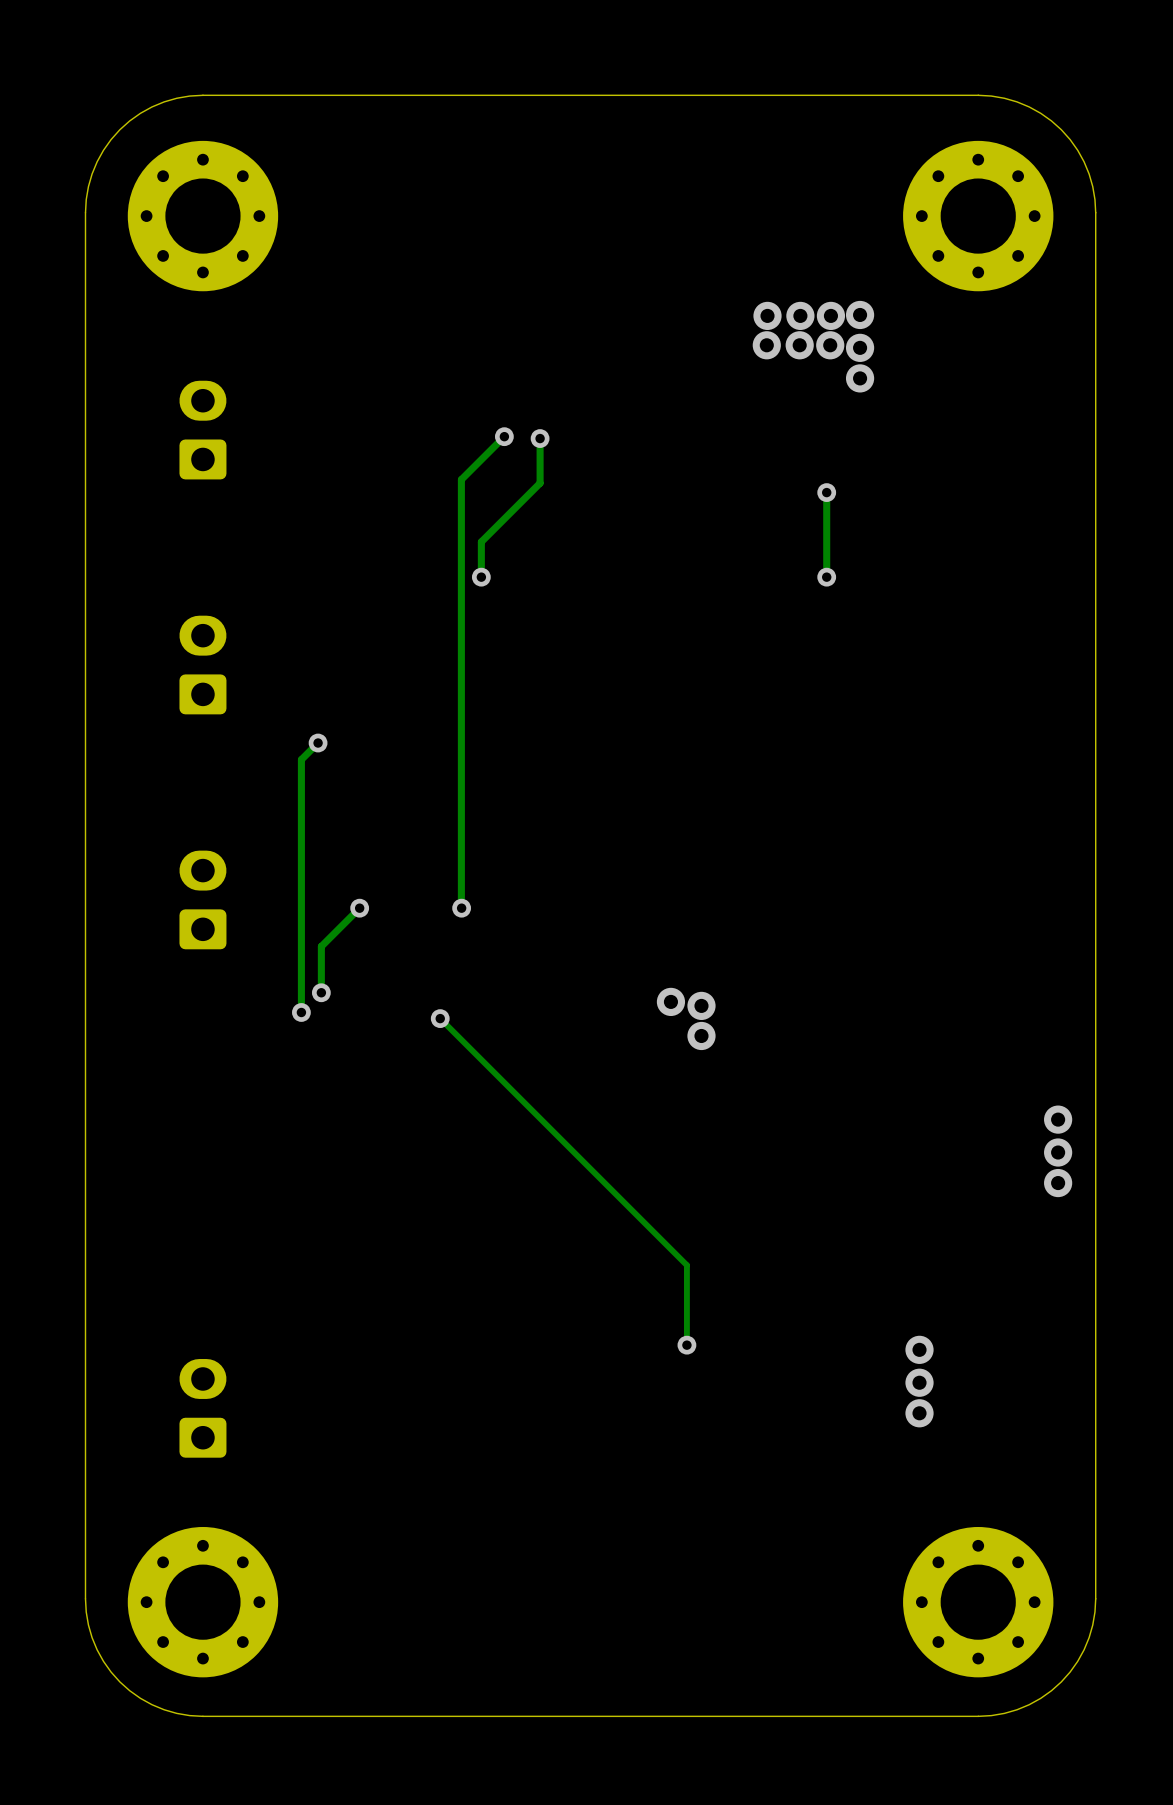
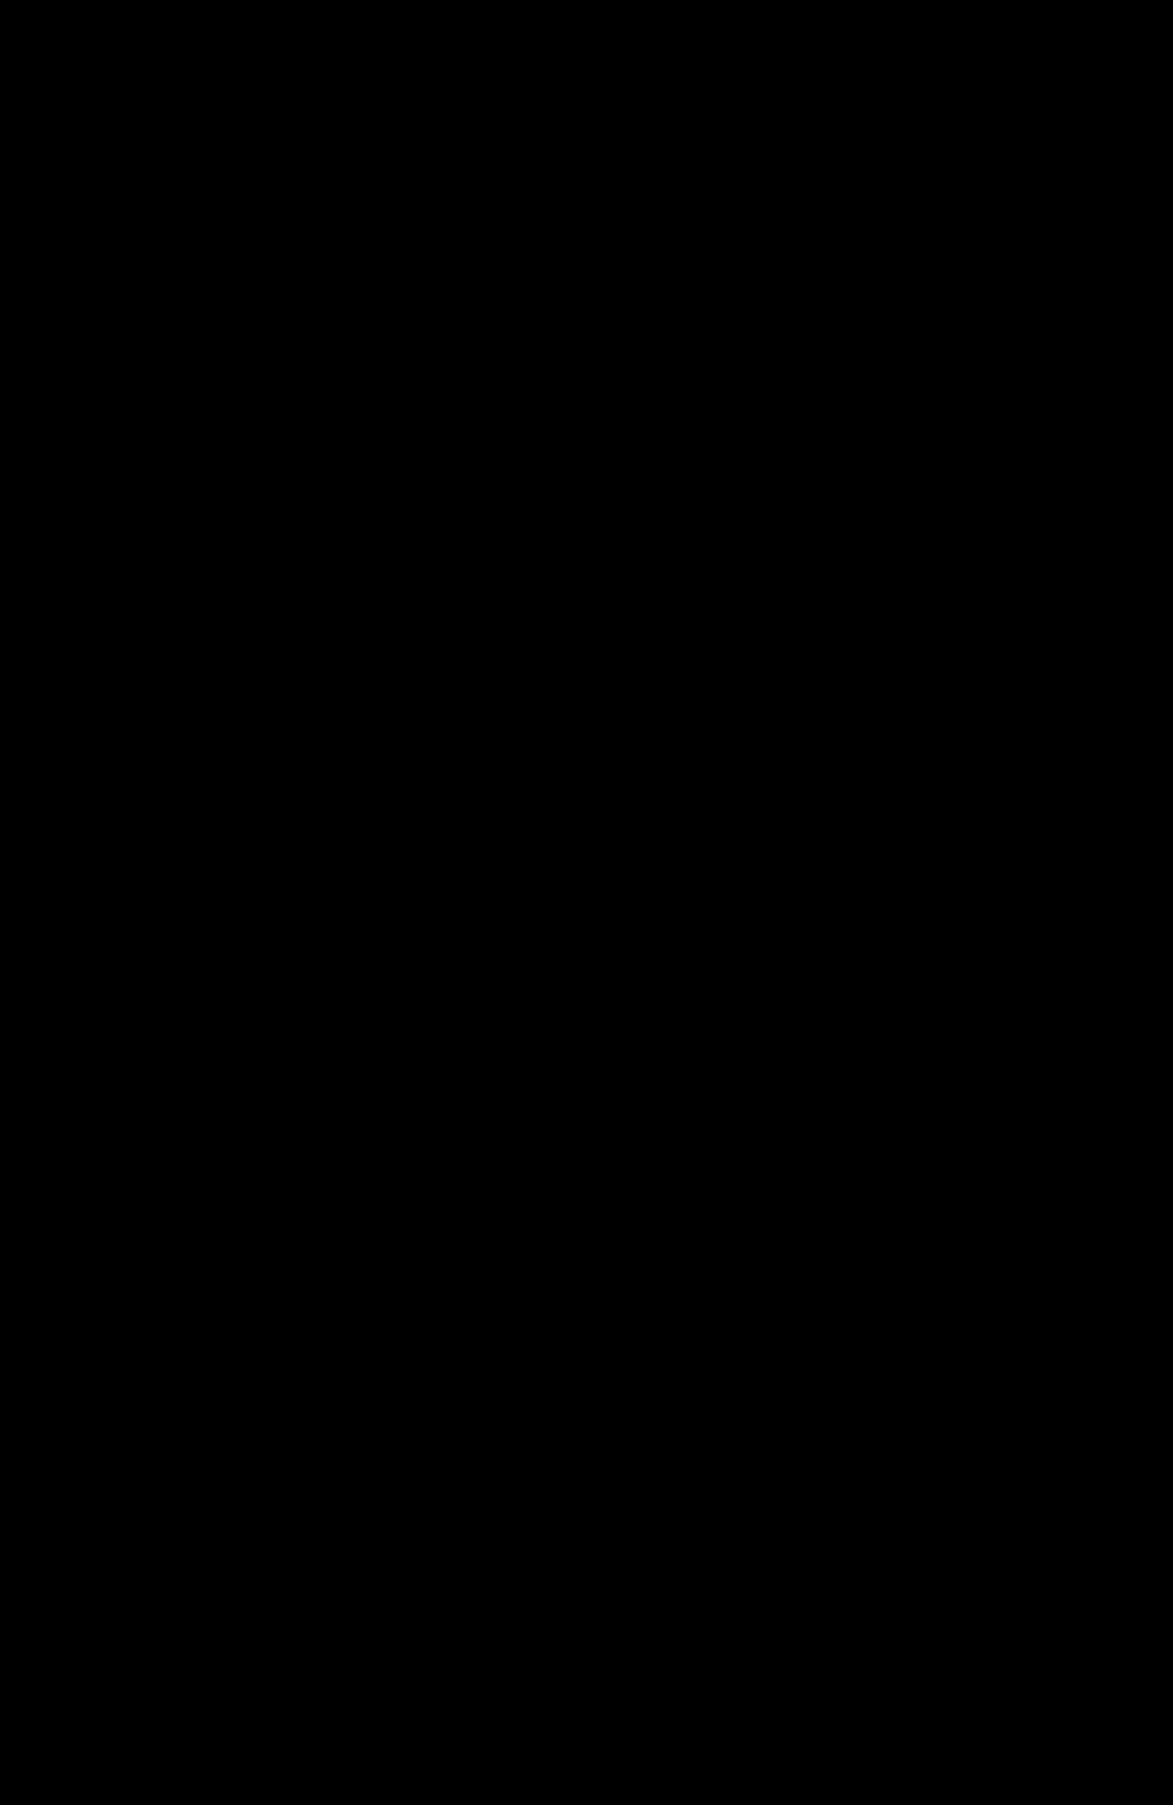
board edge: (978, 95) (189, 96) (164, 101) (129, 120) (111, 139) (97, 161) (88, 186) (85, 212) (85, 1598) (92, 1637) (103, 1661) (129, 1690) (152, 1704) (176, 1713) (202, 1716) (991, 1715) (1029, 1704) (1051, 1690) (1070, 1672) (1084, 1649) (1092, 1625) (1095, 1598) (1094, 199) (1084, 161) (1070, 139) (1051, 120) (1017, 101) (978, 95) -> none
part: (202, 216) -> none
part: (978, 216) -> none
via: (860, 314) -> none
via: (767, 315) -> none
via: (800, 315) -> none
via: (830, 315) -> none
via: (766, 345) -> none
via: (799, 345) -> none
via: (830, 345) -> none
via: (860, 347) -> none
via: (860, 378) -> none
part: (202, 430) -> none
track: (504, 436) (461, 479) (461, 907) -> none
via: (504, 436) -> none
track: (540, 438) (540, 483) (481, 541) (481, 577) -> none
via: (540, 438) -> none
track: (826, 492) (826, 577) -> none
via: (826, 492) -> none
via: (481, 577) -> none
via: (826, 577) -> none
part: (202, 665) -> none
track: (318, 743) (301, 759) (301, 1012) -> none
via: (318, 743) -> none
part: (202, 899) -> none
track: (359, 908) (321, 946) (321, 992) -> none
via: (359, 908) -> none
via: (461, 908) -> none
via: (321, 992) -> none
via: (670, 1001) -> none
via: (701, 1005) -> none
via: (301, 1012) -> none
track: (440, 1018) (686, 1265) (686, 1345) -> none
via: (440, 1018) -> none
via: (701, 1035) -> none
via: (1058, 1119) -> none
via: (1058, 1152) -> none
via: (1058, 1183) -> none
via: (686, 1345) -> none
via: (919, 1349) -> none
via: (919, 1382) -> none
part: (202, 1408) -> none
via: (919, 1413) -> none
part: (202, 1602) -> none
part: (978, 1602) -> none

